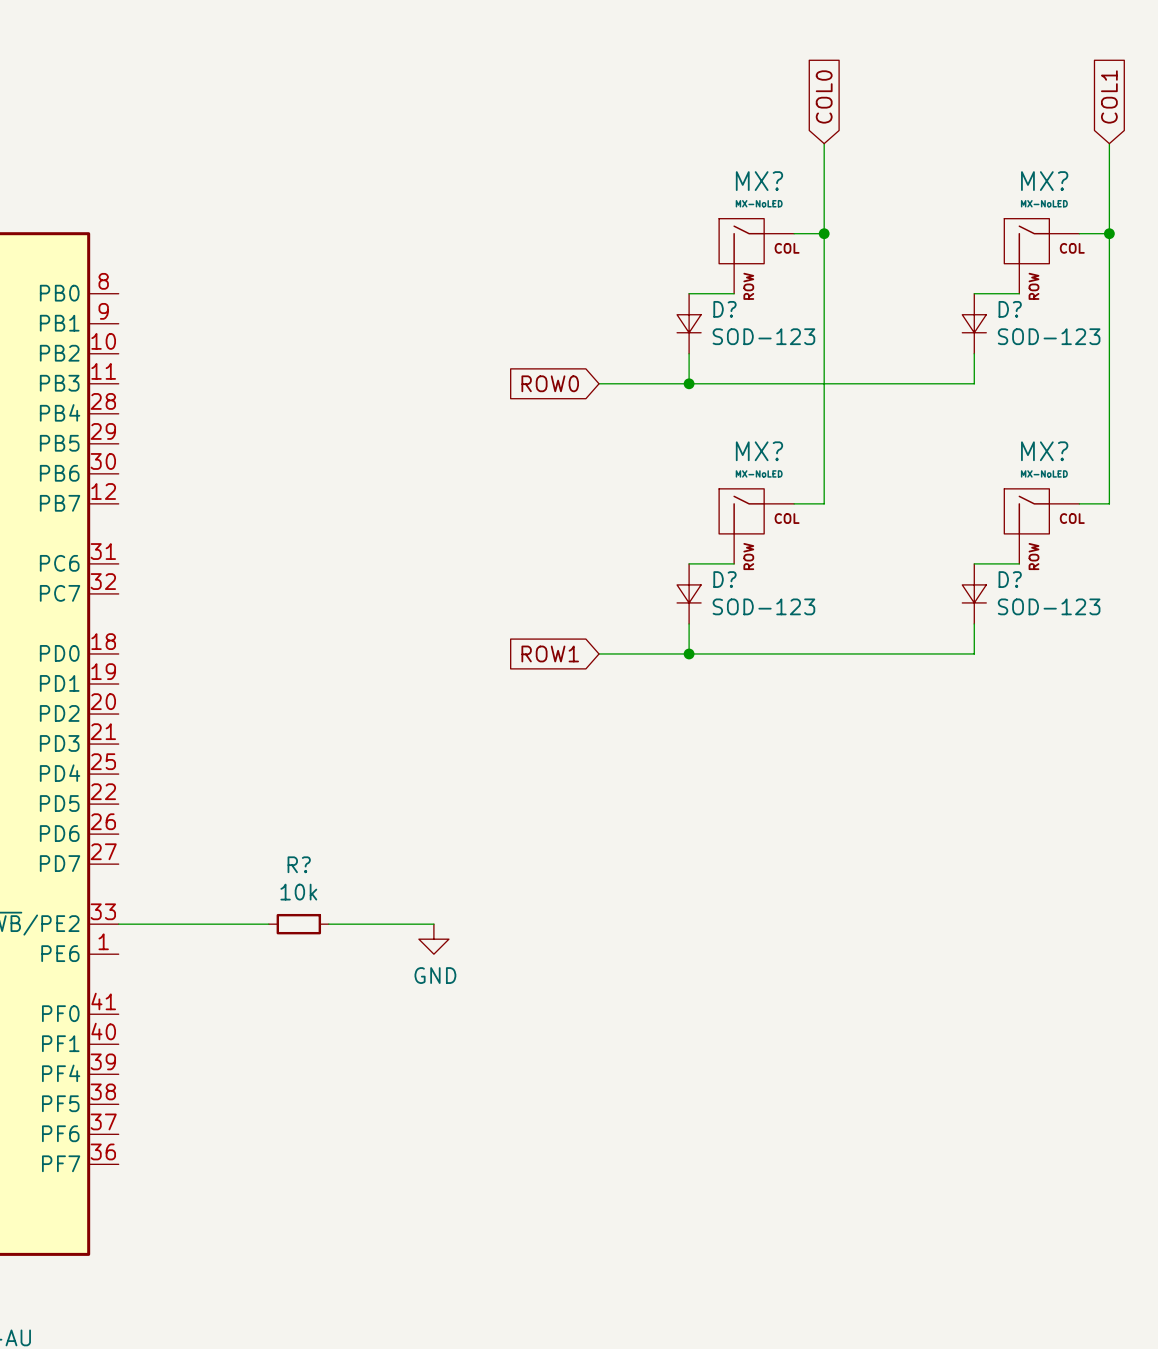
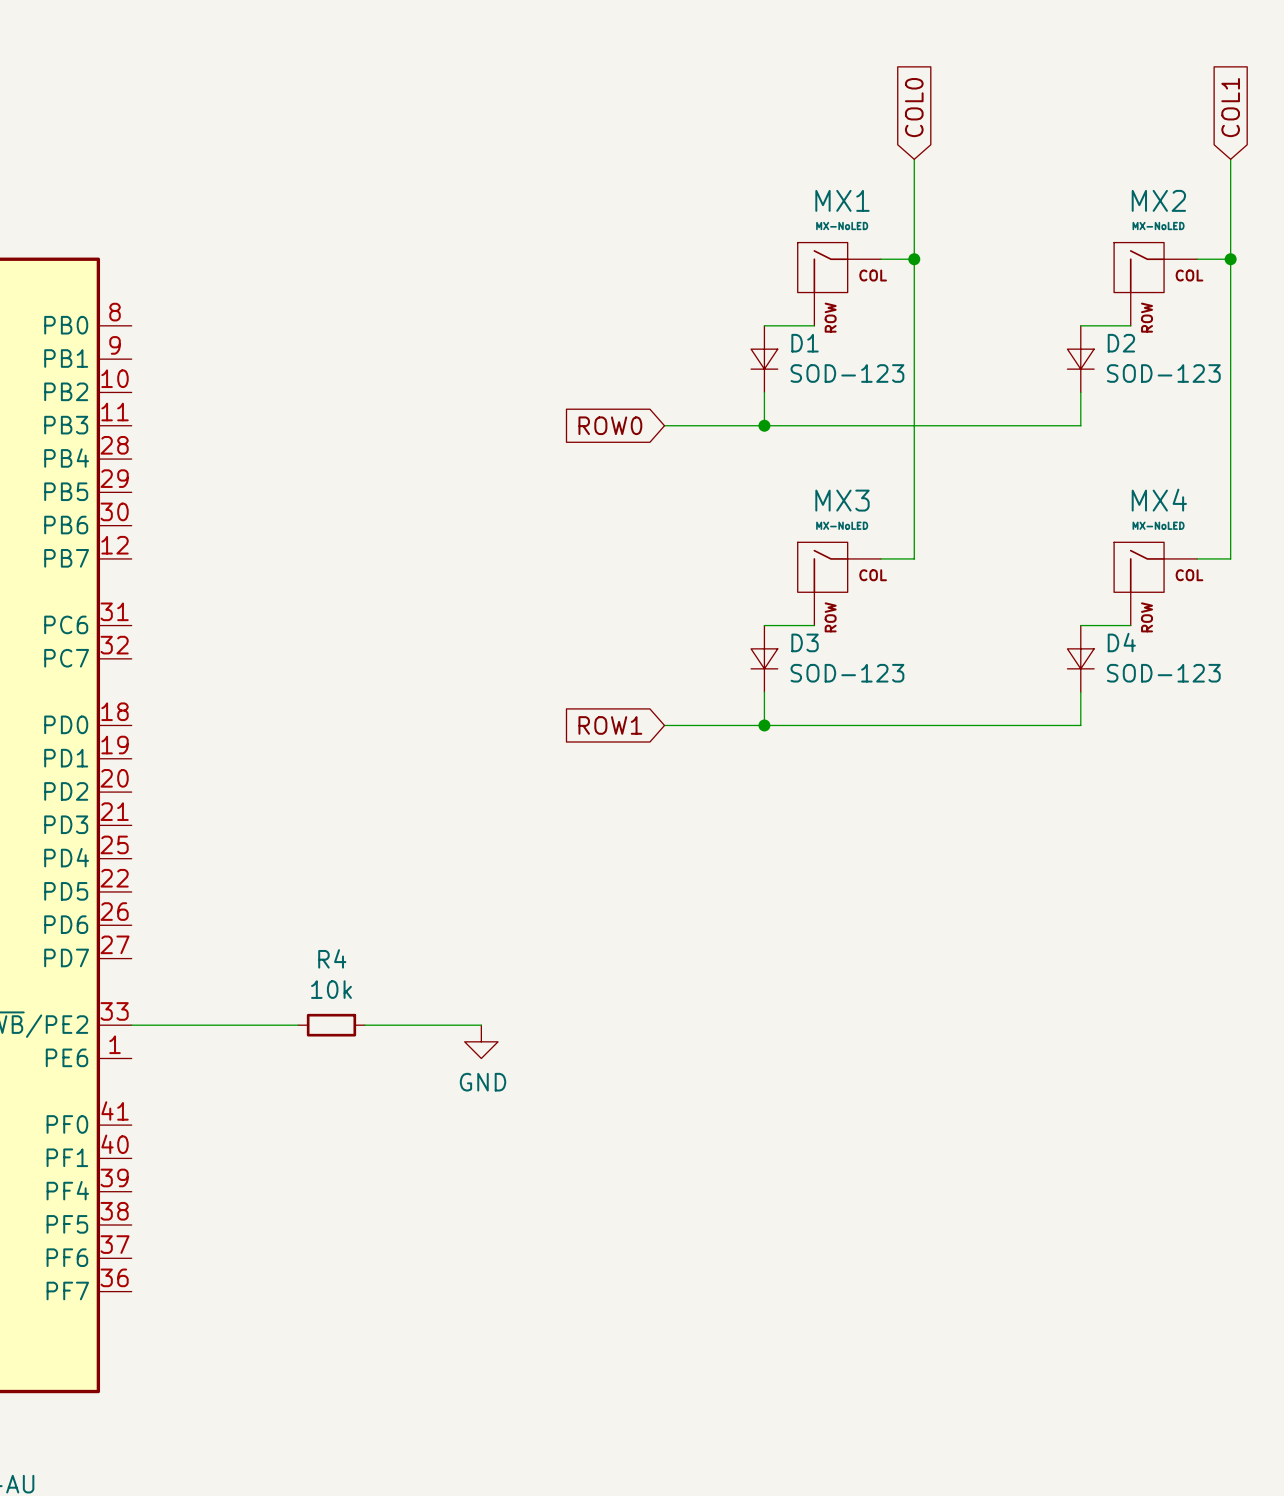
MX? name: MX? (759, 181) -> MX1 (842, 200)
MX? name: MX? (1044, 181) -> MX2 (1158, 200)
D? name: D? (724, 309) -> D1 (805, 343)
D? name: D? (1010, 309) -> D2 (1121, 343)
MX? name: MX? (759, 451) -> MX3 (842, 500)
MX? name: MX? (1044, 451) -> MX4 (1159, 500)
D? name: D? (724, 579) -> D3 (805, 642)
D? name: D? (1010, 579) -> D4 (1121, 642)
R? name: R? (299, 864) -> R4 (332, 958)

